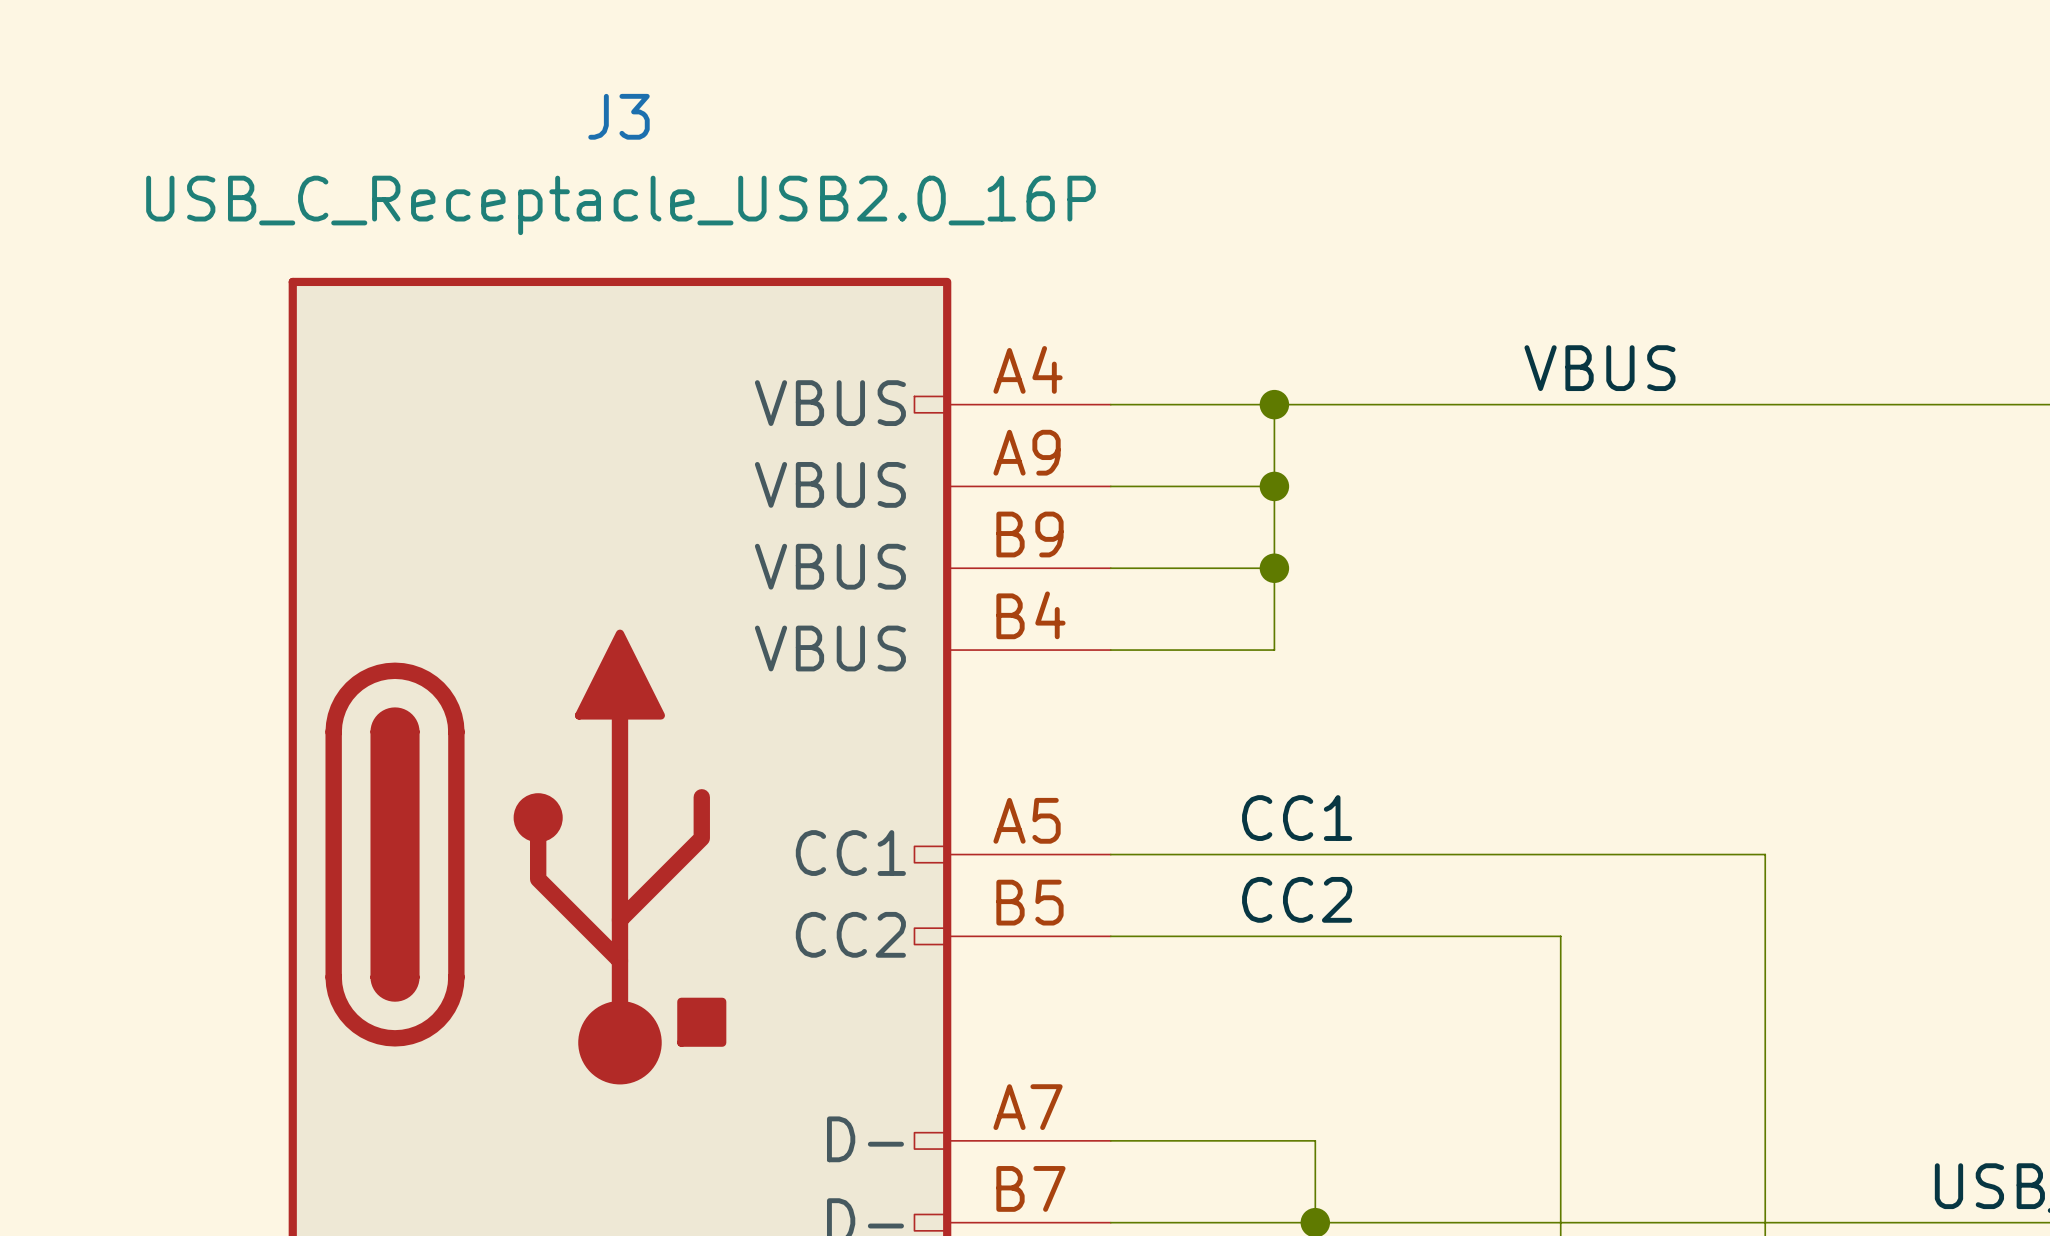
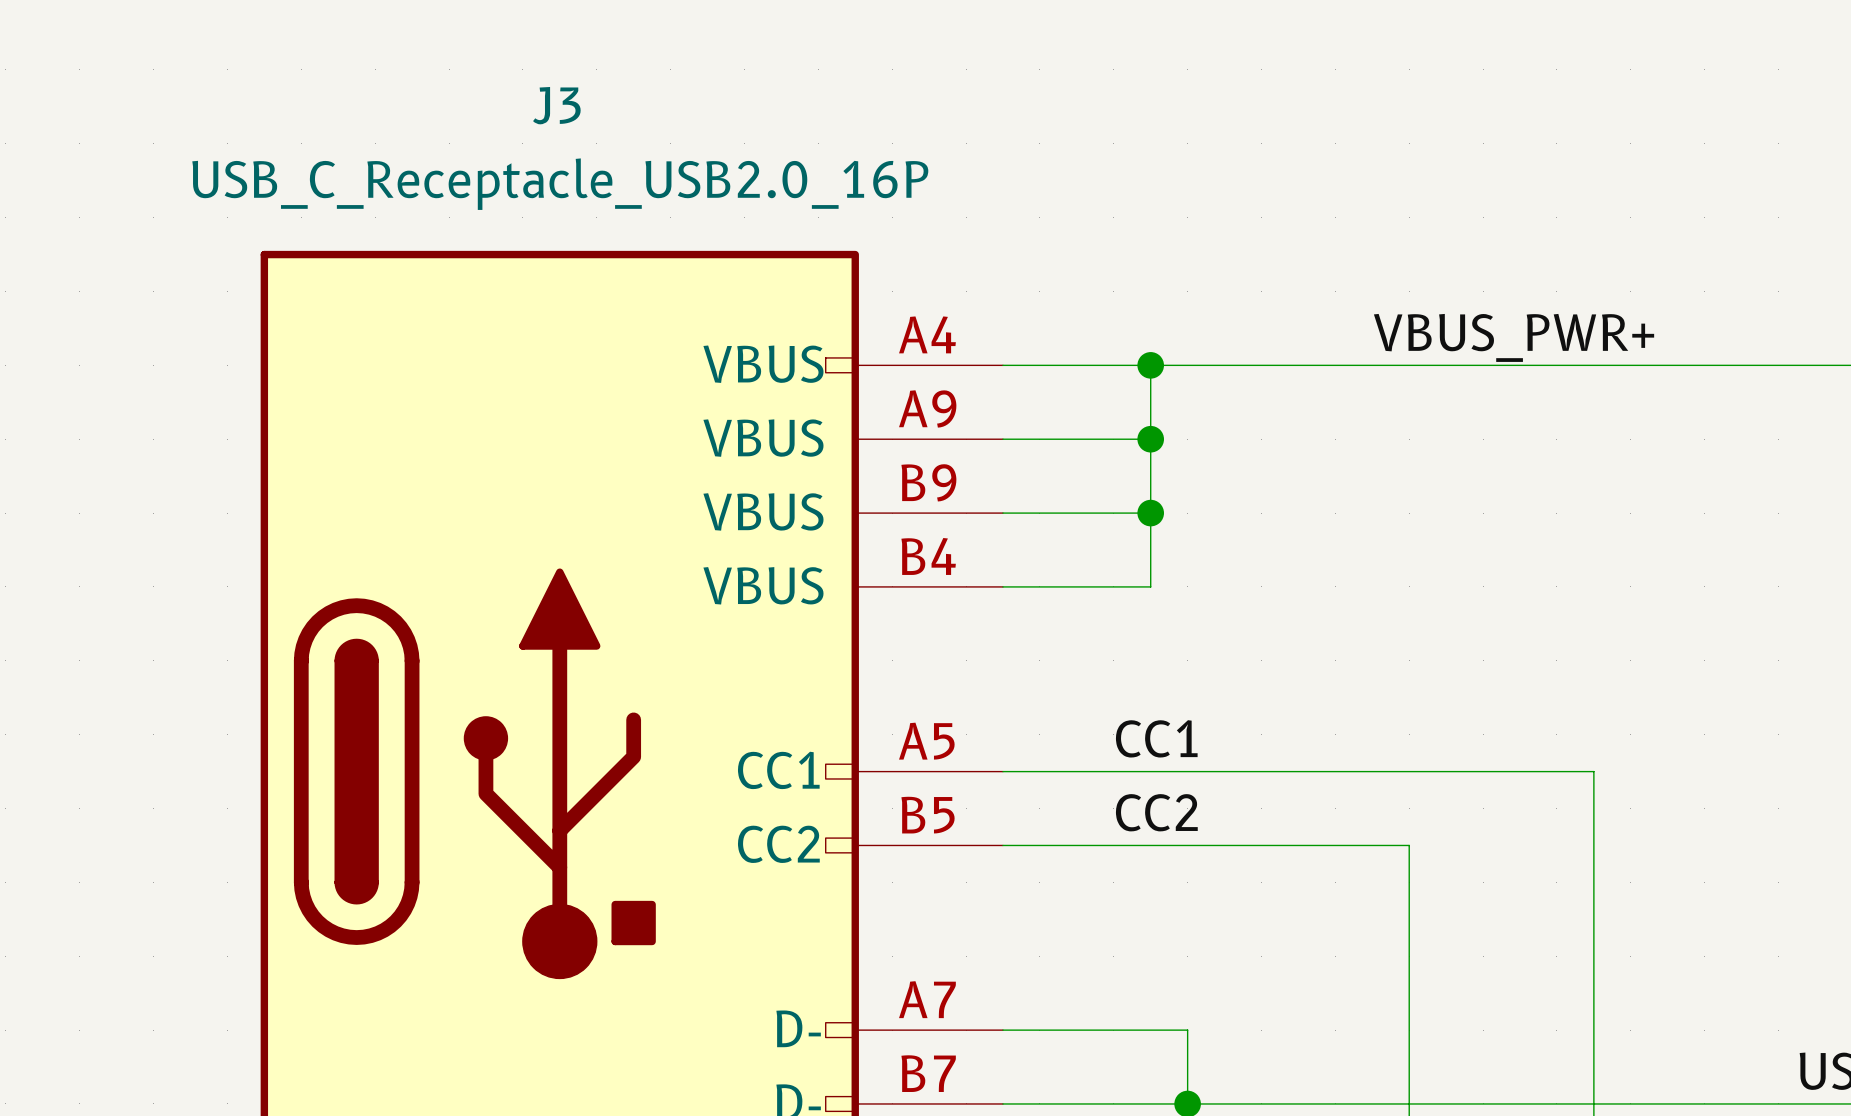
label: VBUS (1599, 368) -> VBUS_PWR+ (1514, 337)

